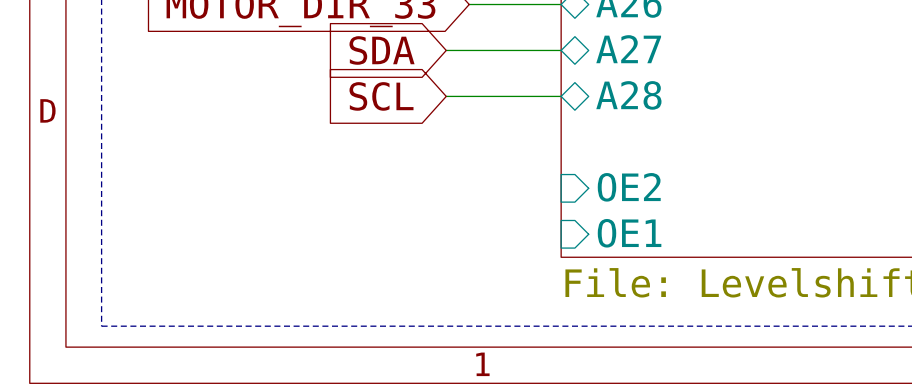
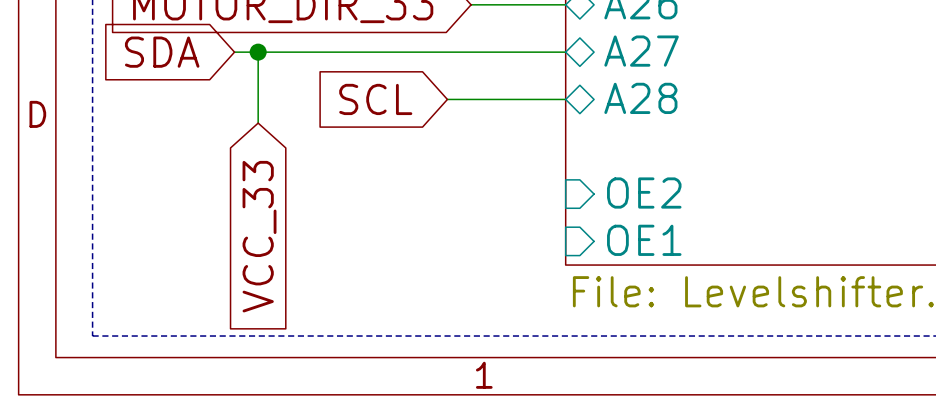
wire: none -> (234, 52) (447, 52)
wire: none -> (258, 52) (258, 123)
junction: none -> (258, 52)
global label position: SDA (382, 50) -> SDA (162, 52)
global label: none -> VCC_33 (259, 236)

